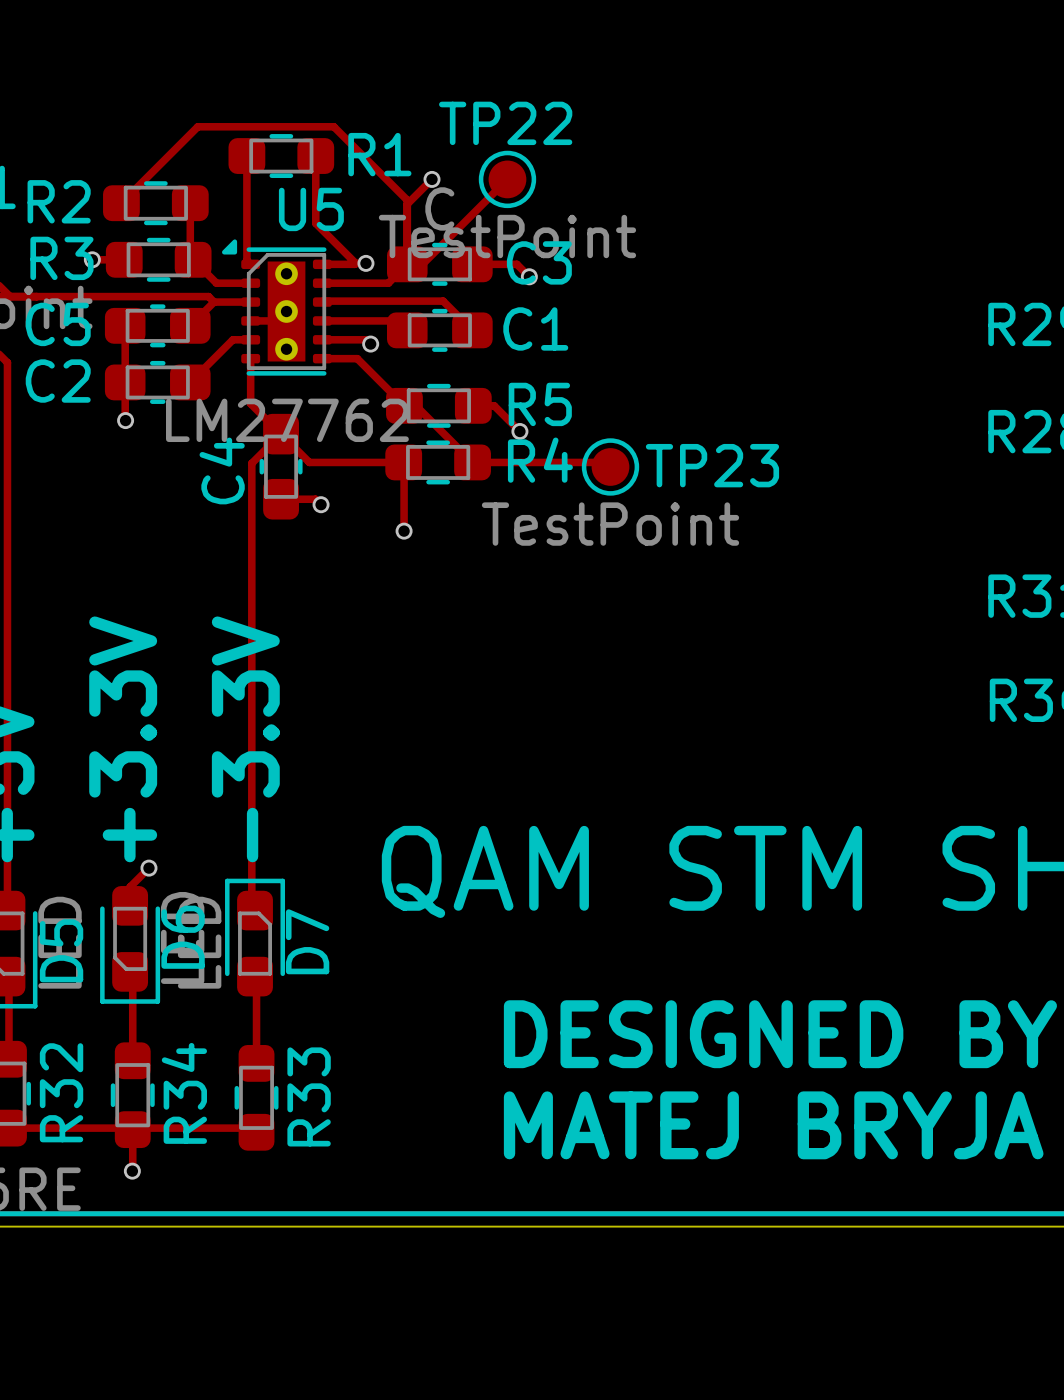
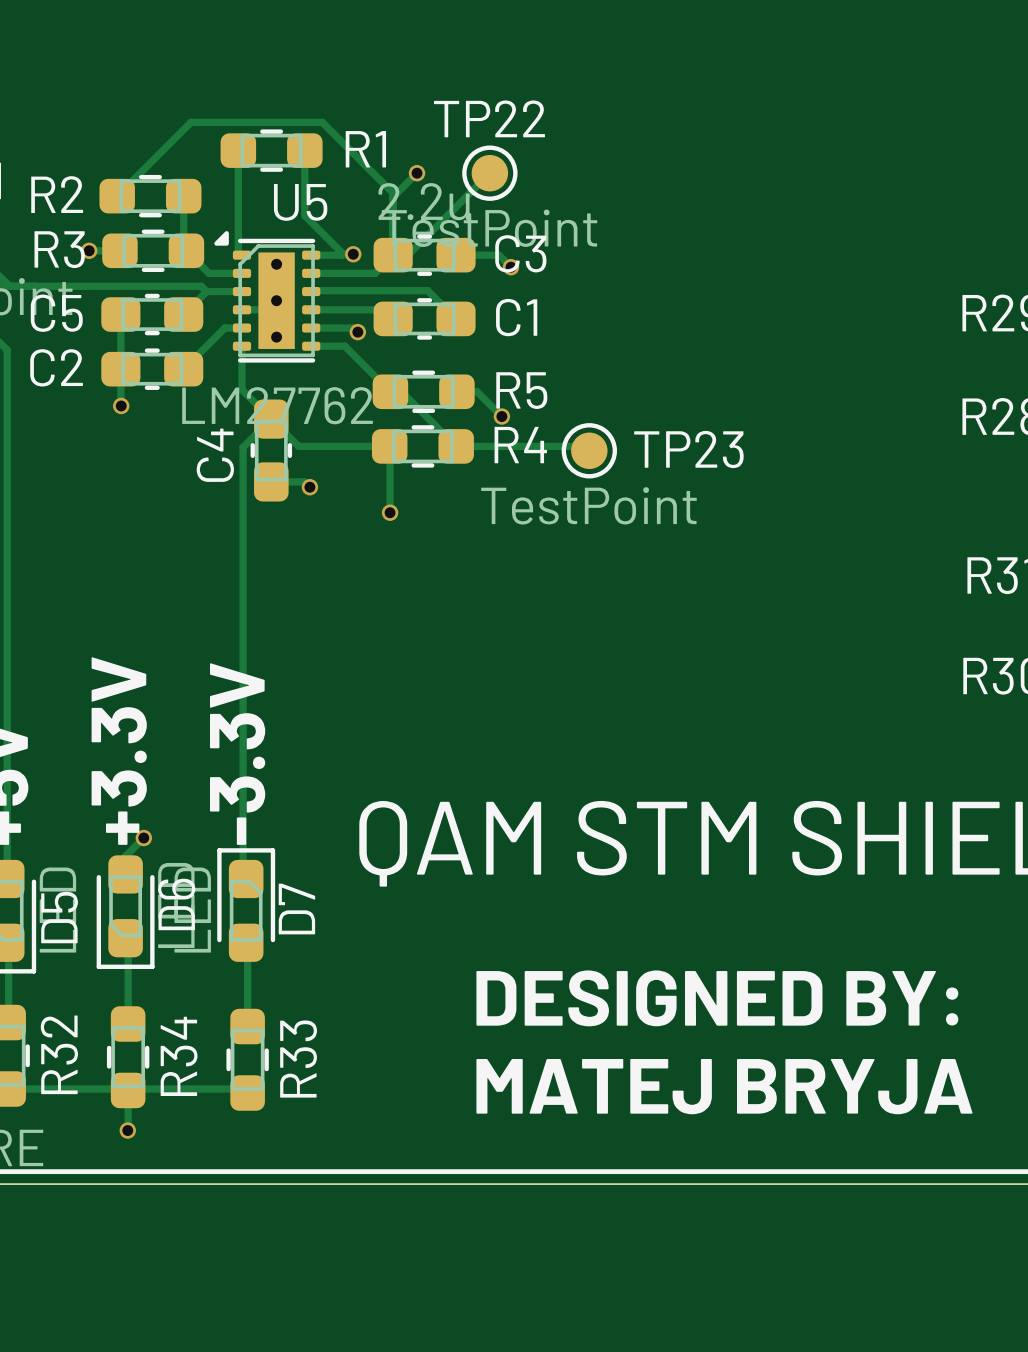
C3 value: C (439, 208) -> 2.2u (424, 201)

